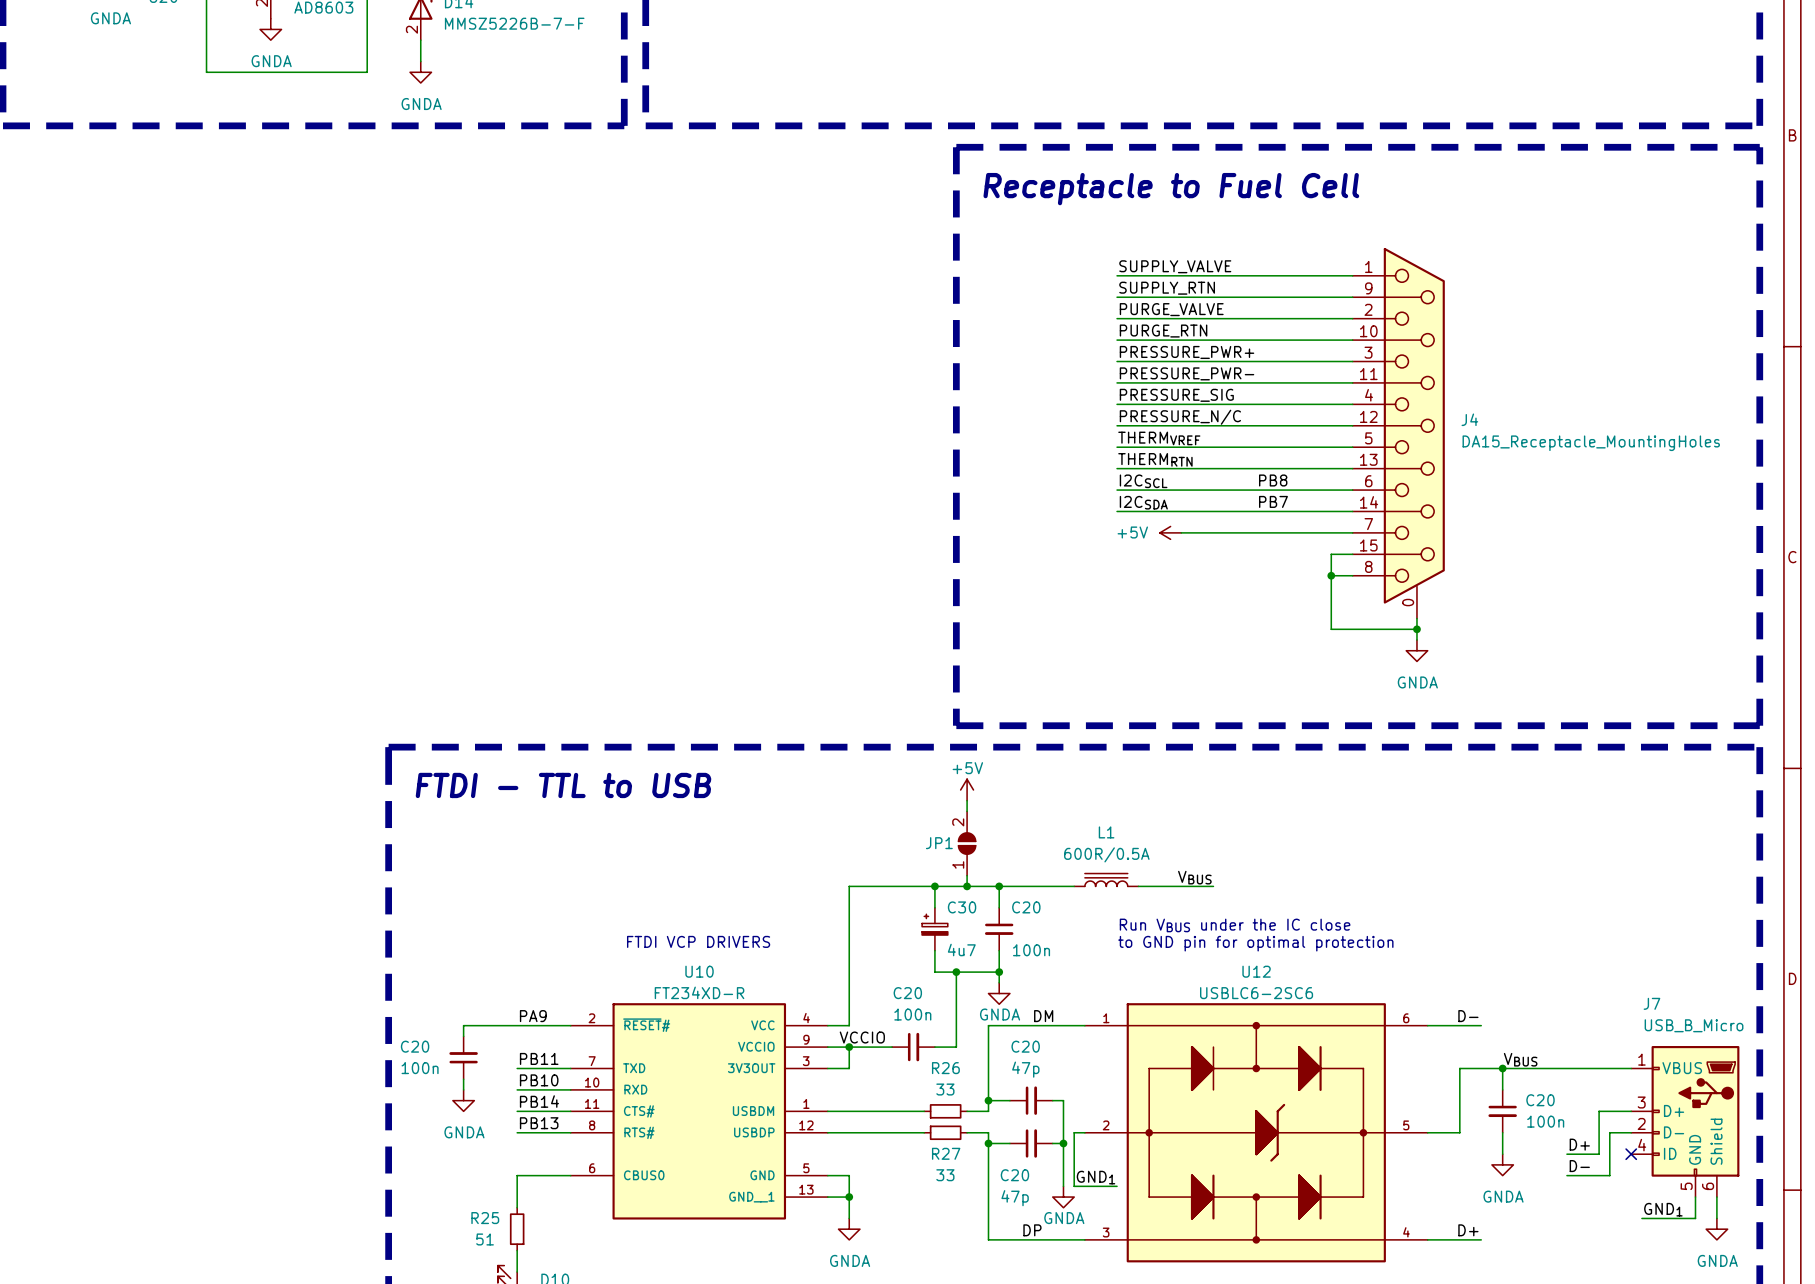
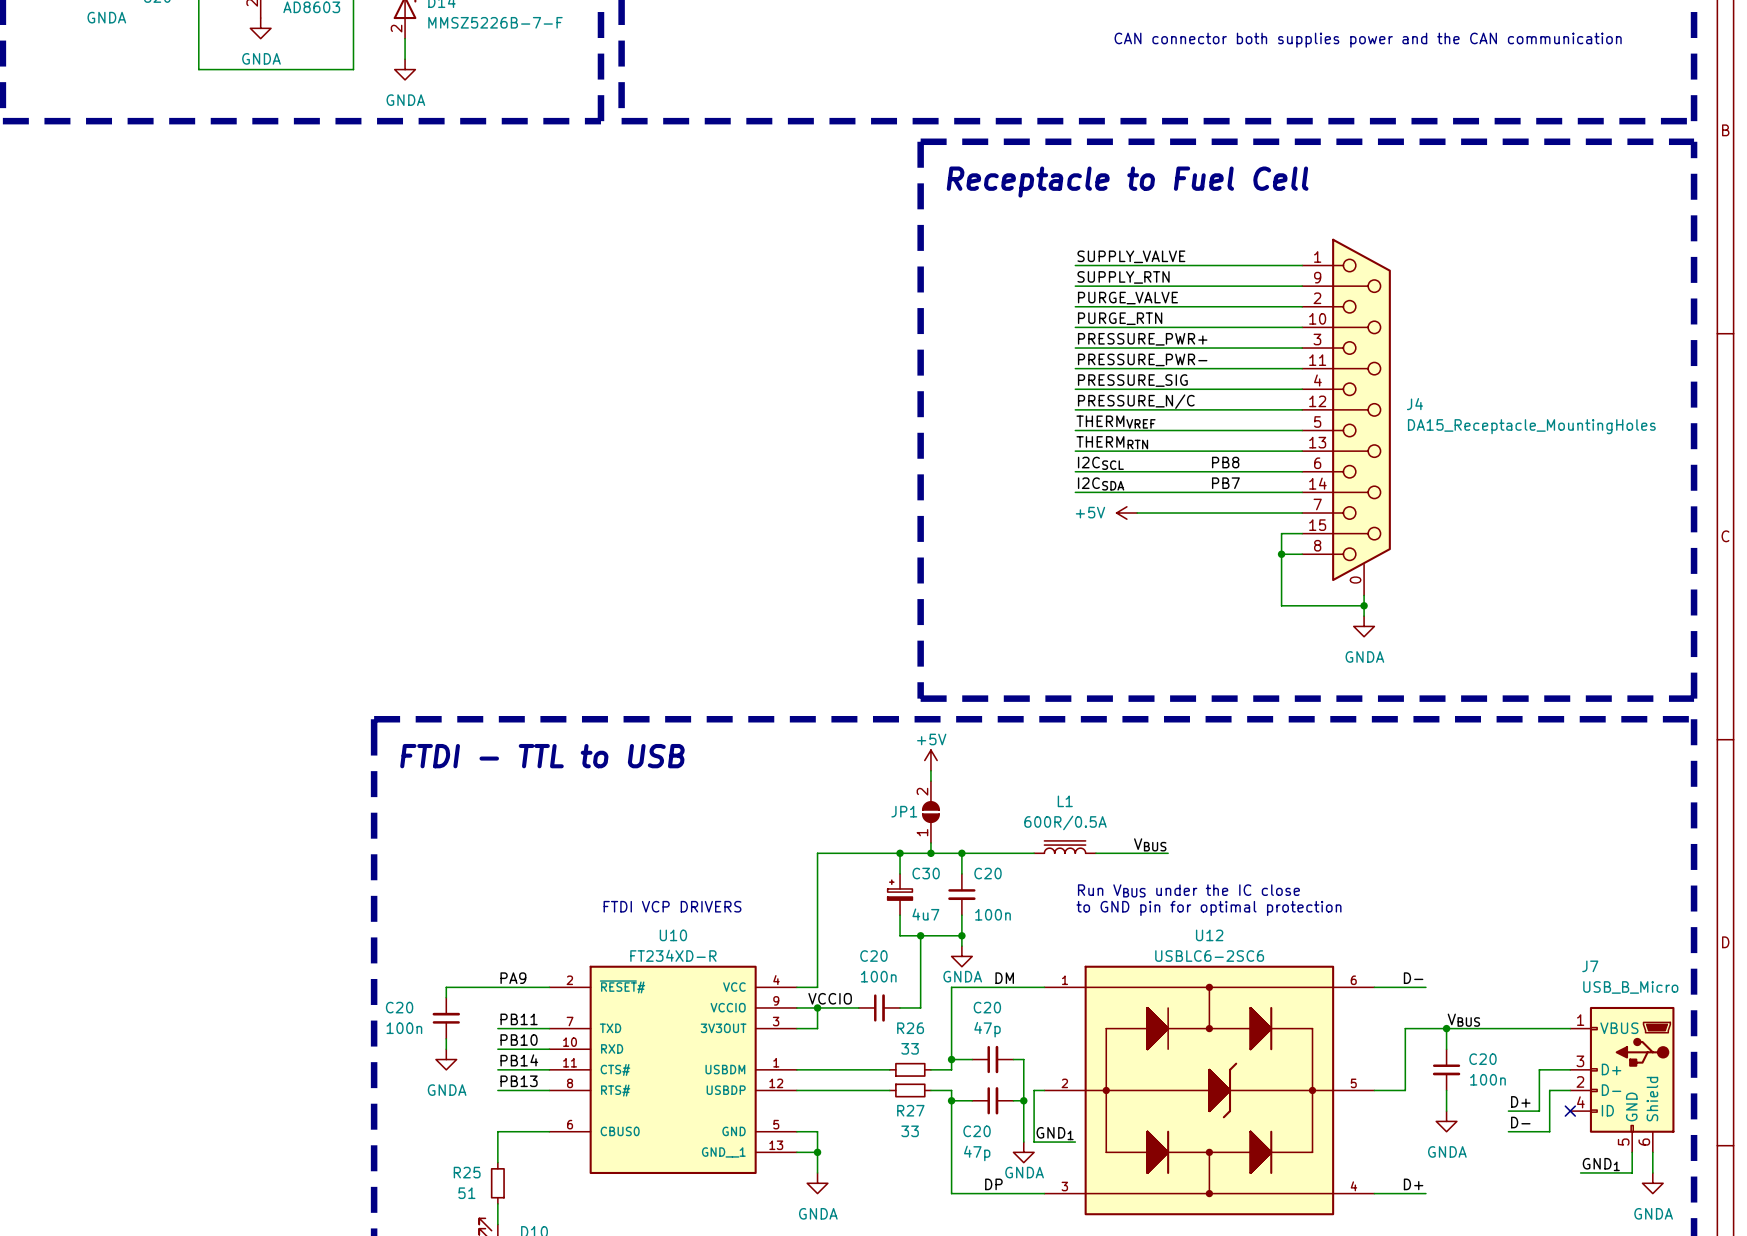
text: none -> CAN connector both supplies power and the CAN communication (1368, 40)

